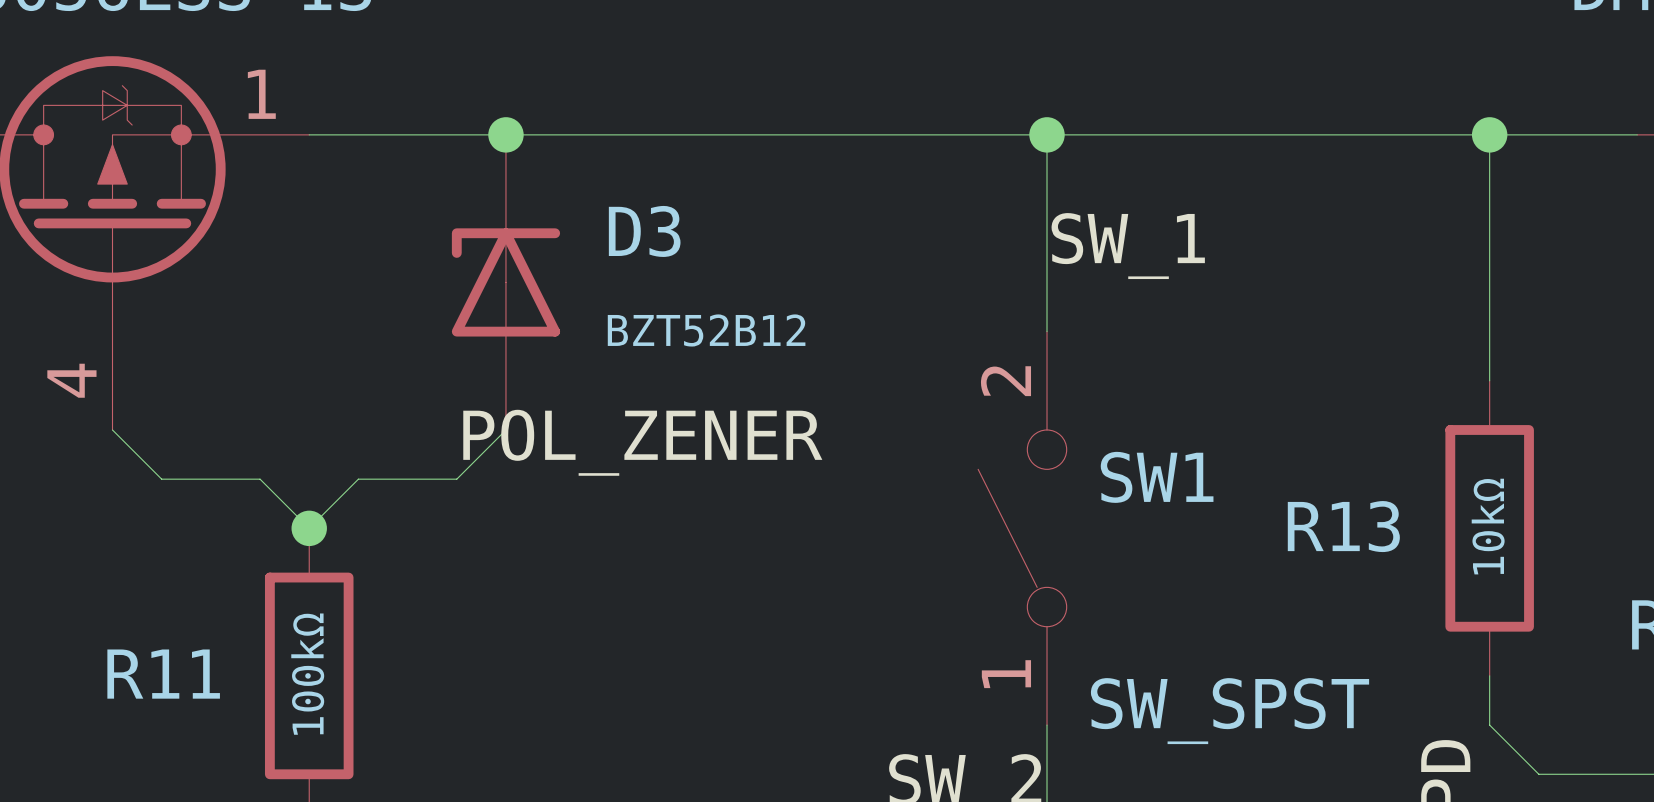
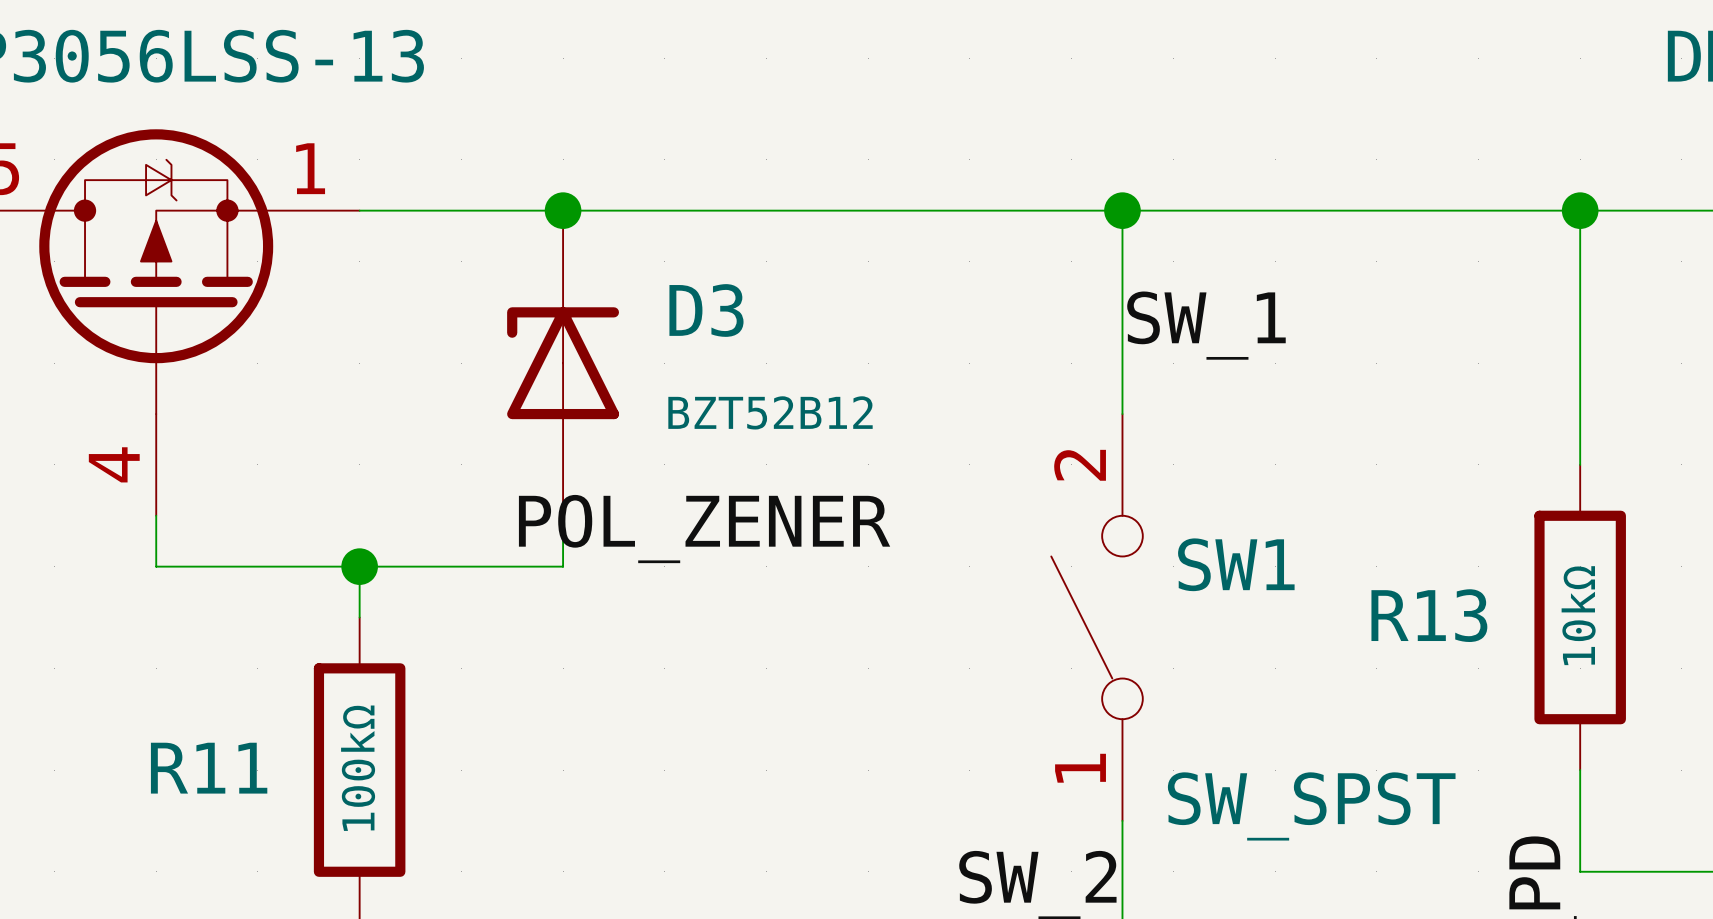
wire: (112, 429) (161, 479) -> (156, 515) (156, 566) (207, 566)
wire: (505, 429) (456, 479) -> (563, 515) (563, 566) (512, 566)
wire: (260, 479) (309, 528) (358, 479) -> (308, 566) (410, 566)
wire: none -> (359, 566) (359, 617)
junction position: (309, 528) -> (359, 566)
wire: (1489, 725) (1538, 774) -> (1580, 820) (1580, 871) (1631, 871)

